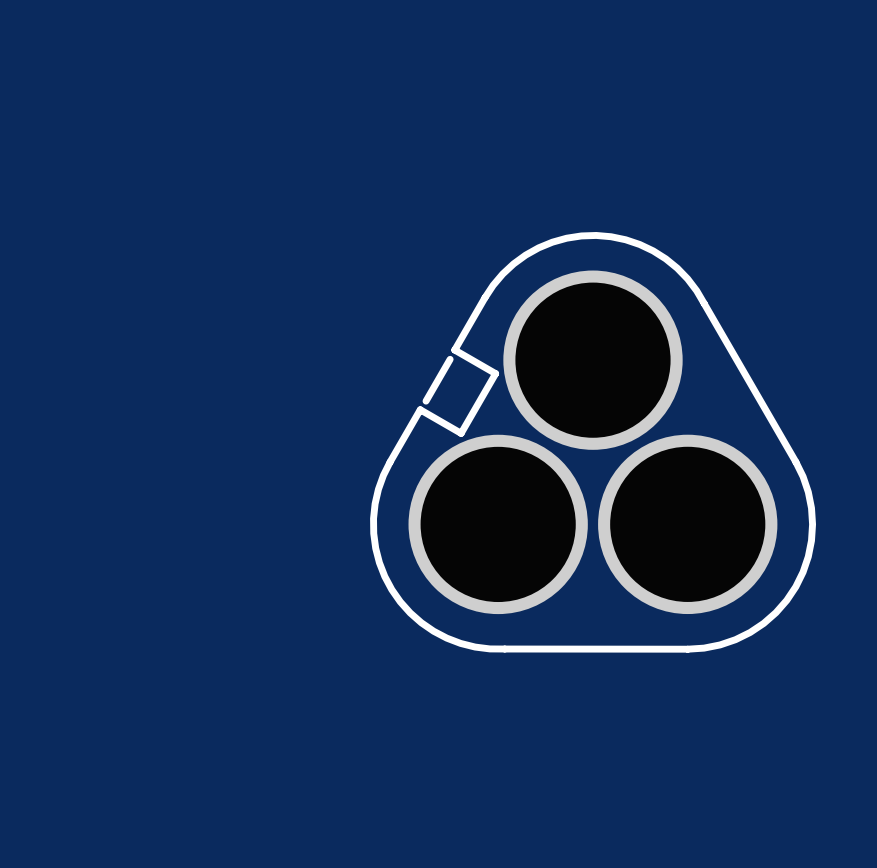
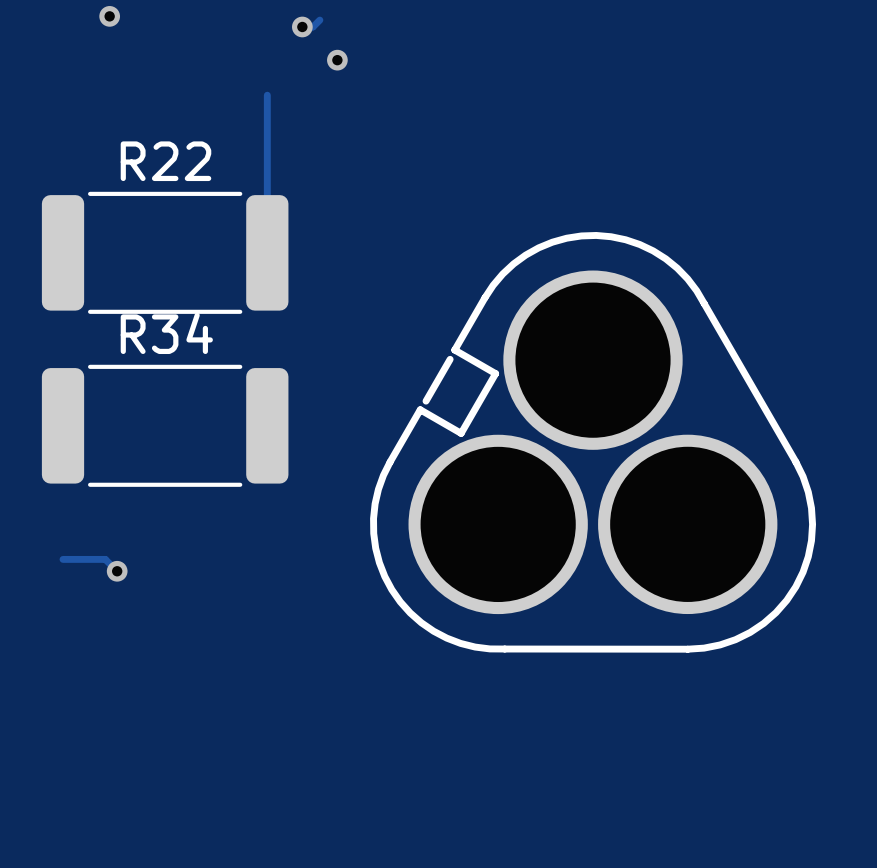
via: none -> (109, 16)
track: none -> (319, 20) (312, 26) (302, 26)
via: none -> (302, 26)
via: none -> (337, 60)
track: none -> (267, 95) (267, 252)
R22: none -> (165, 252)
R34: none -> (165, 425)
track: none -> (63, 559) (105, 559) (117, 571)
via: none -> (117, 571)

